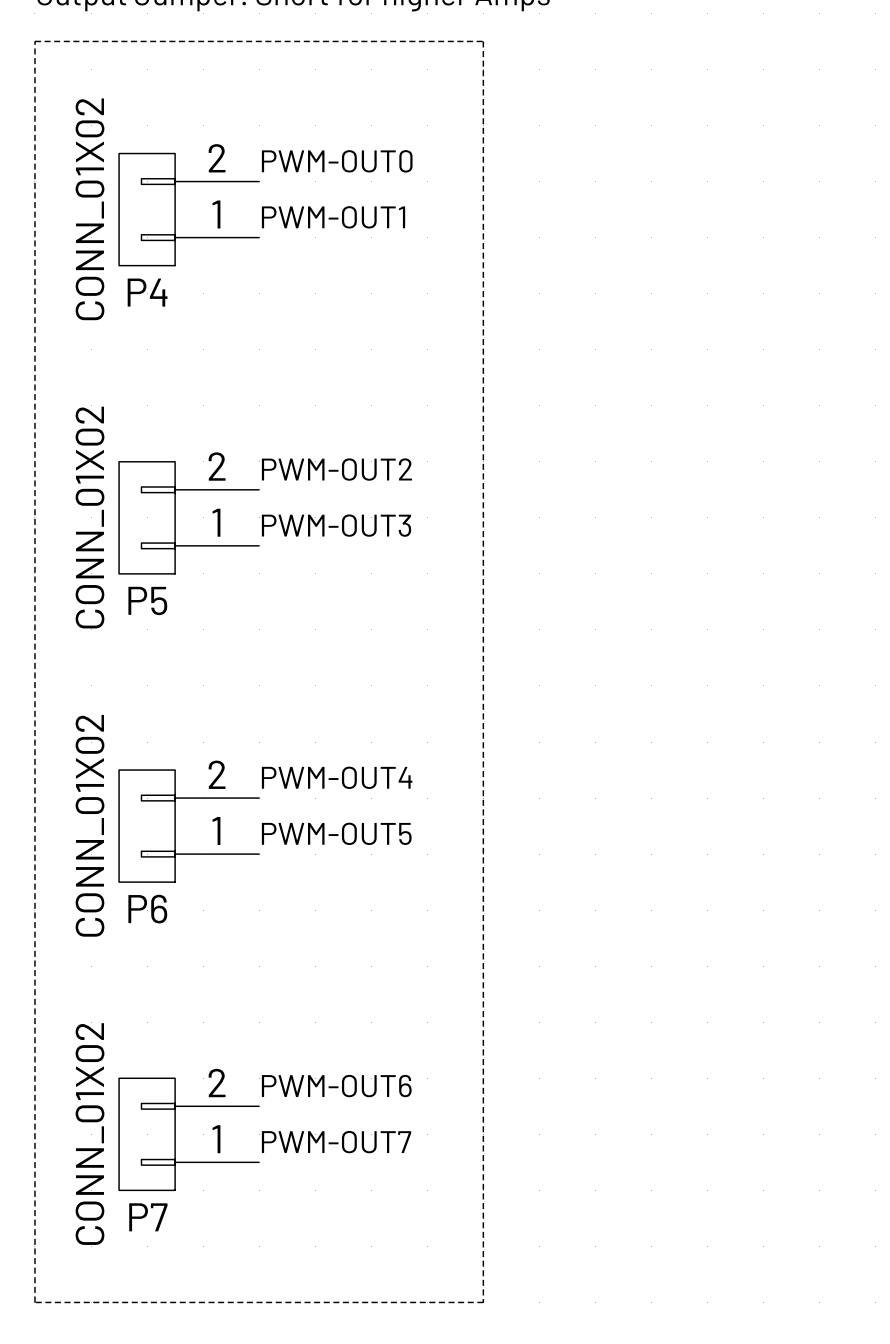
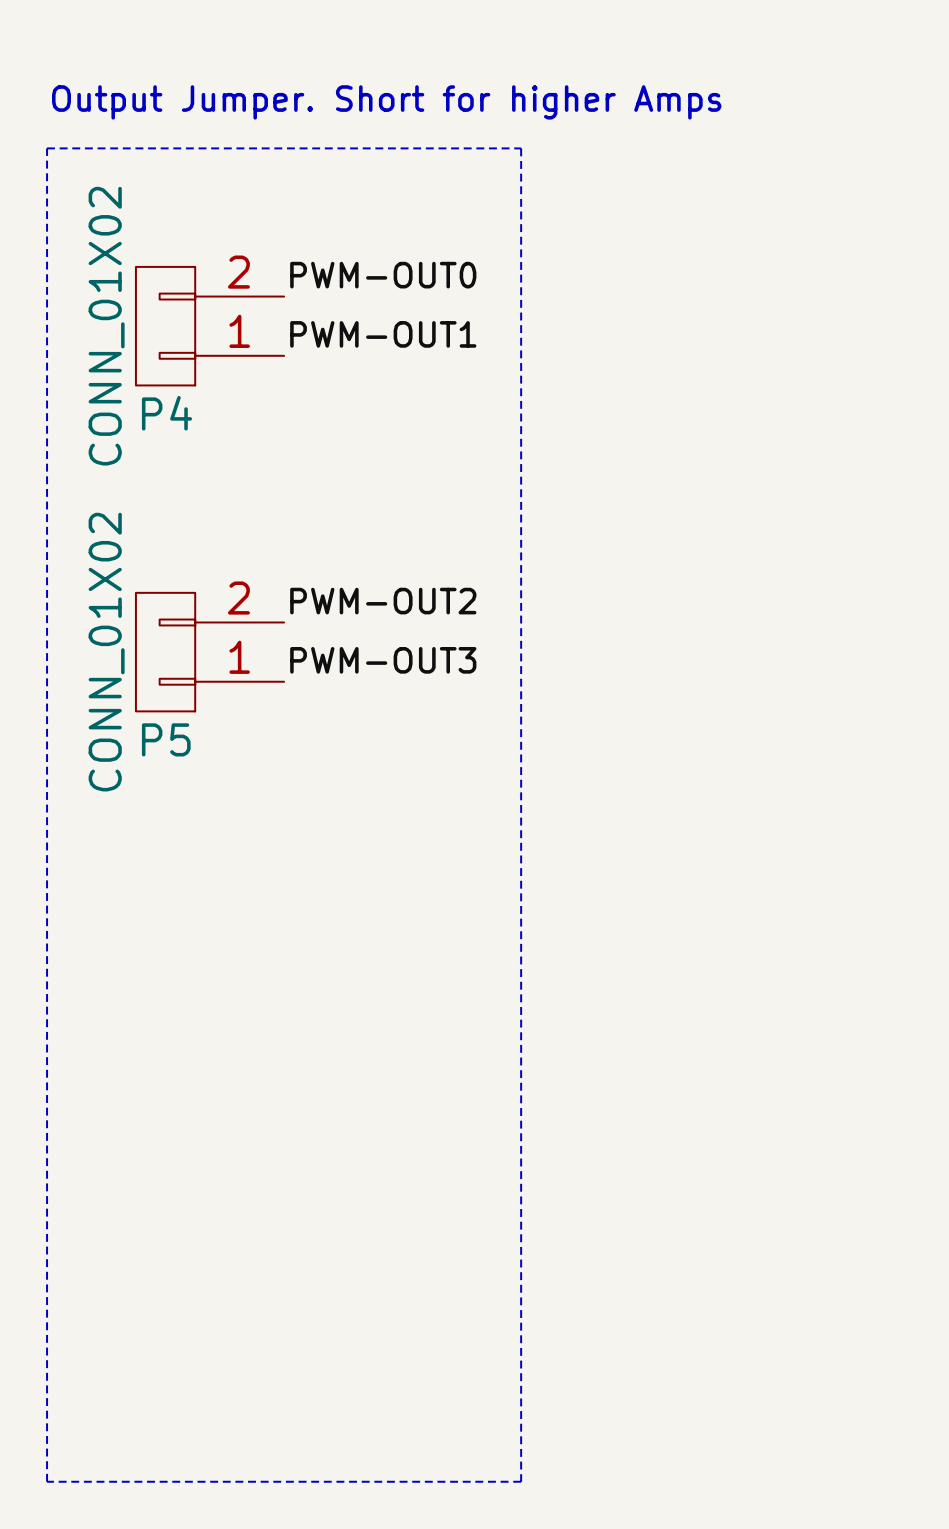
label: PWM-OUT4 (337, 777) -> none
P6: CONN_01X02 (189, 826) -> none
label: PWM-OUT5 (336, 833) -> none
label: PWM-OUT6 (336, 1086) -> none
P7: CONN_01X02 (189, 1134) -> none
label: PWM-OUT7 (336, 1142) -> none

